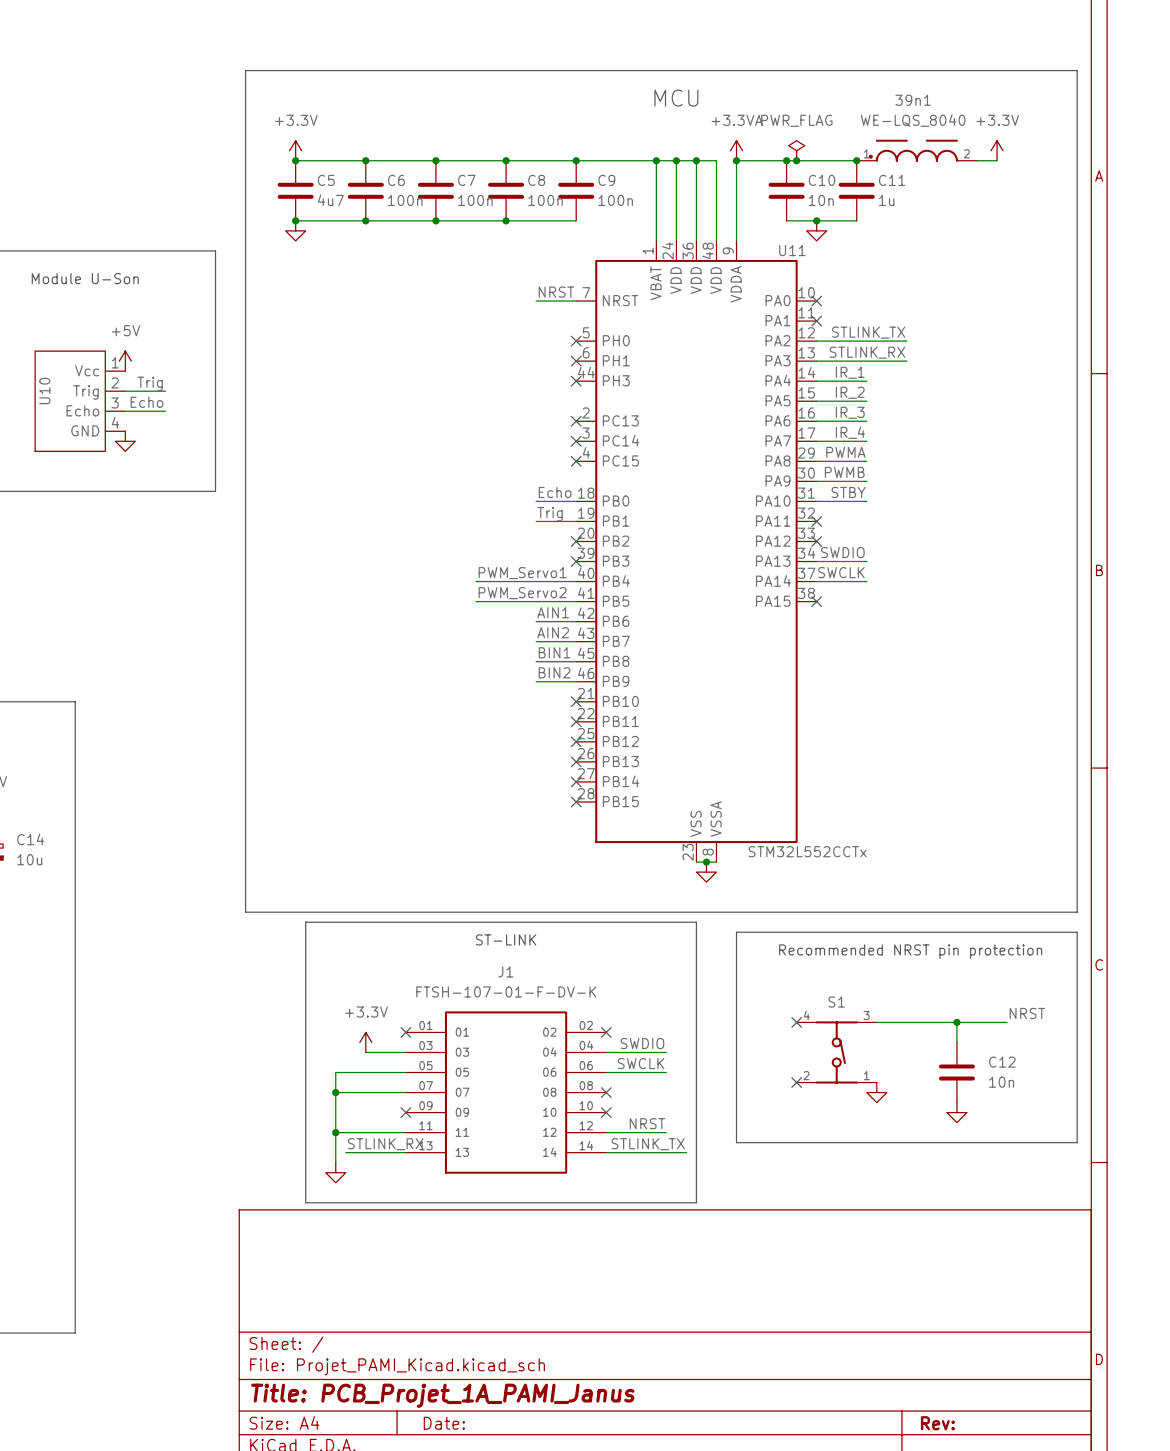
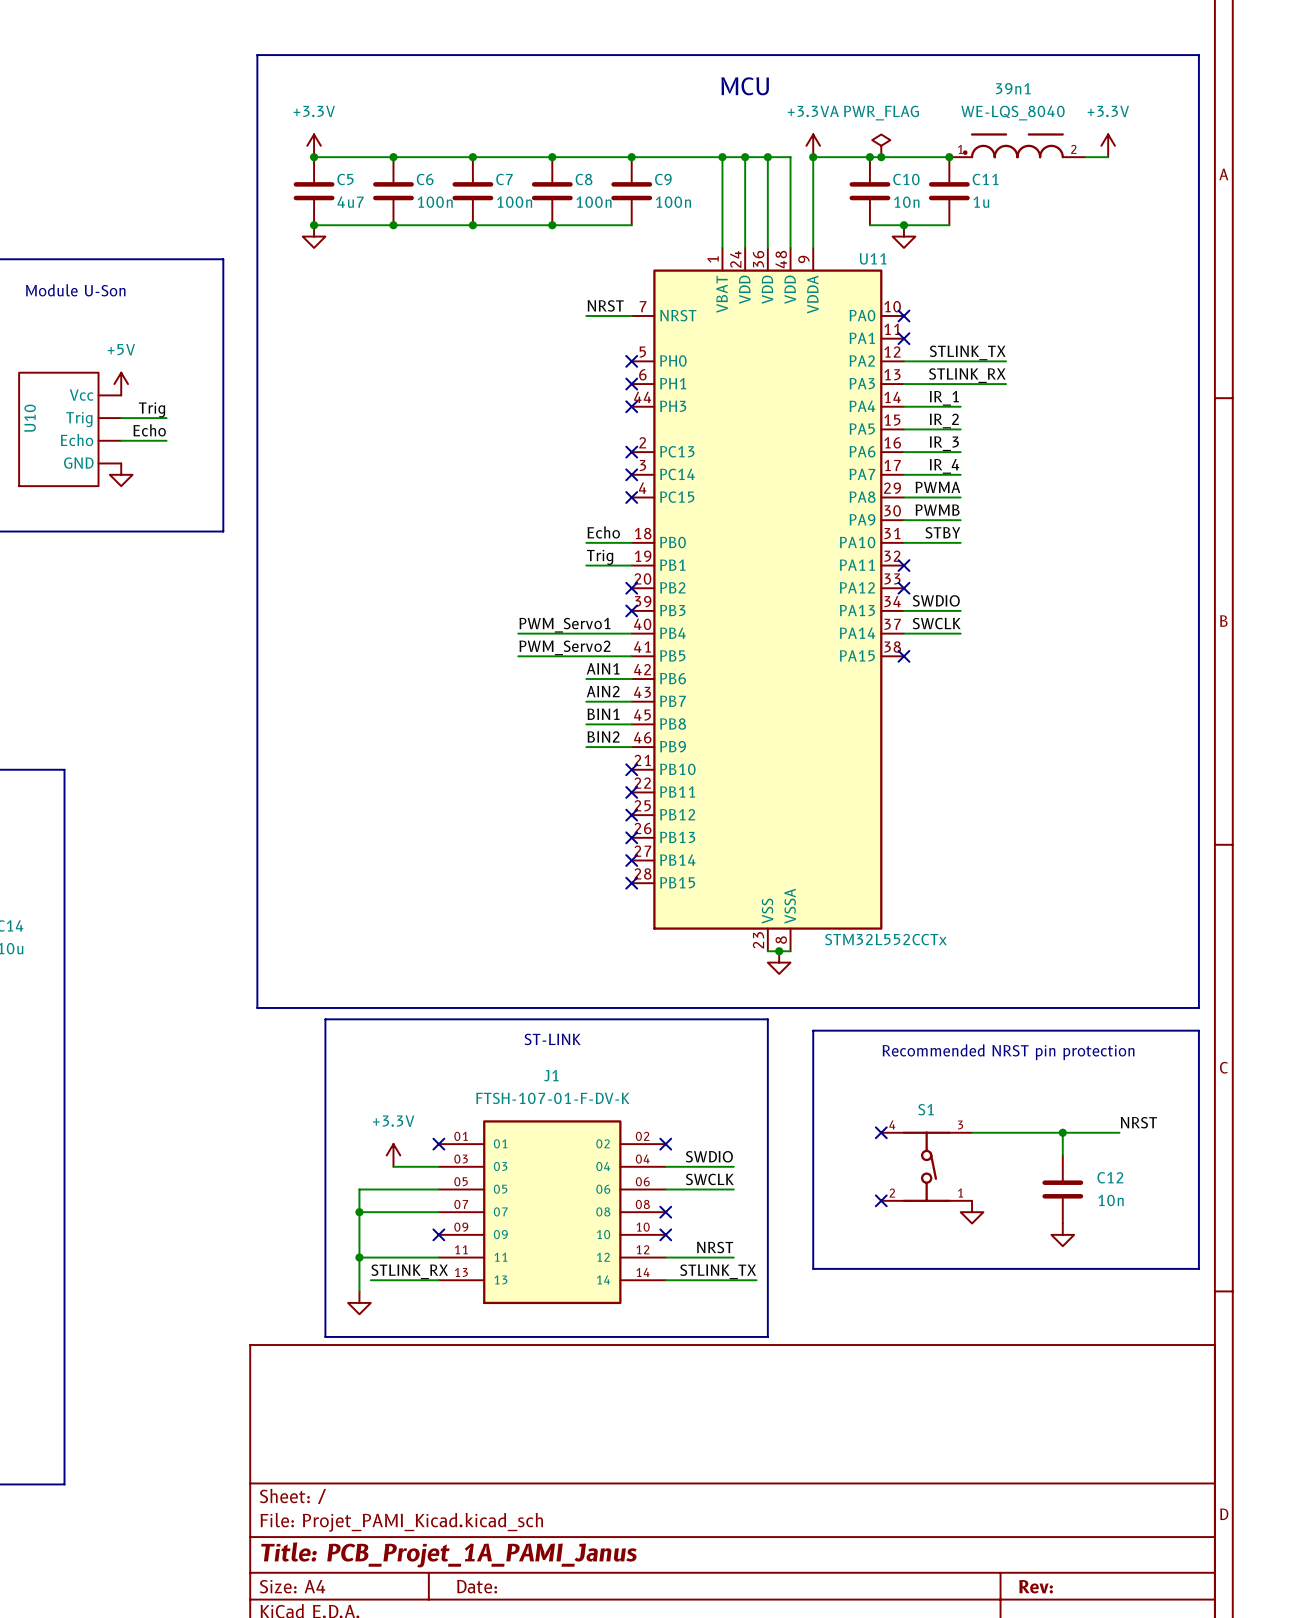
U10 pin number: 1 (115, 362) -> none
U10 pin number: 2 (115, 382) -> none
U10 pin number: 3 (115, 402) -> none
U10 pin number: 4 (115, 422) -> none

